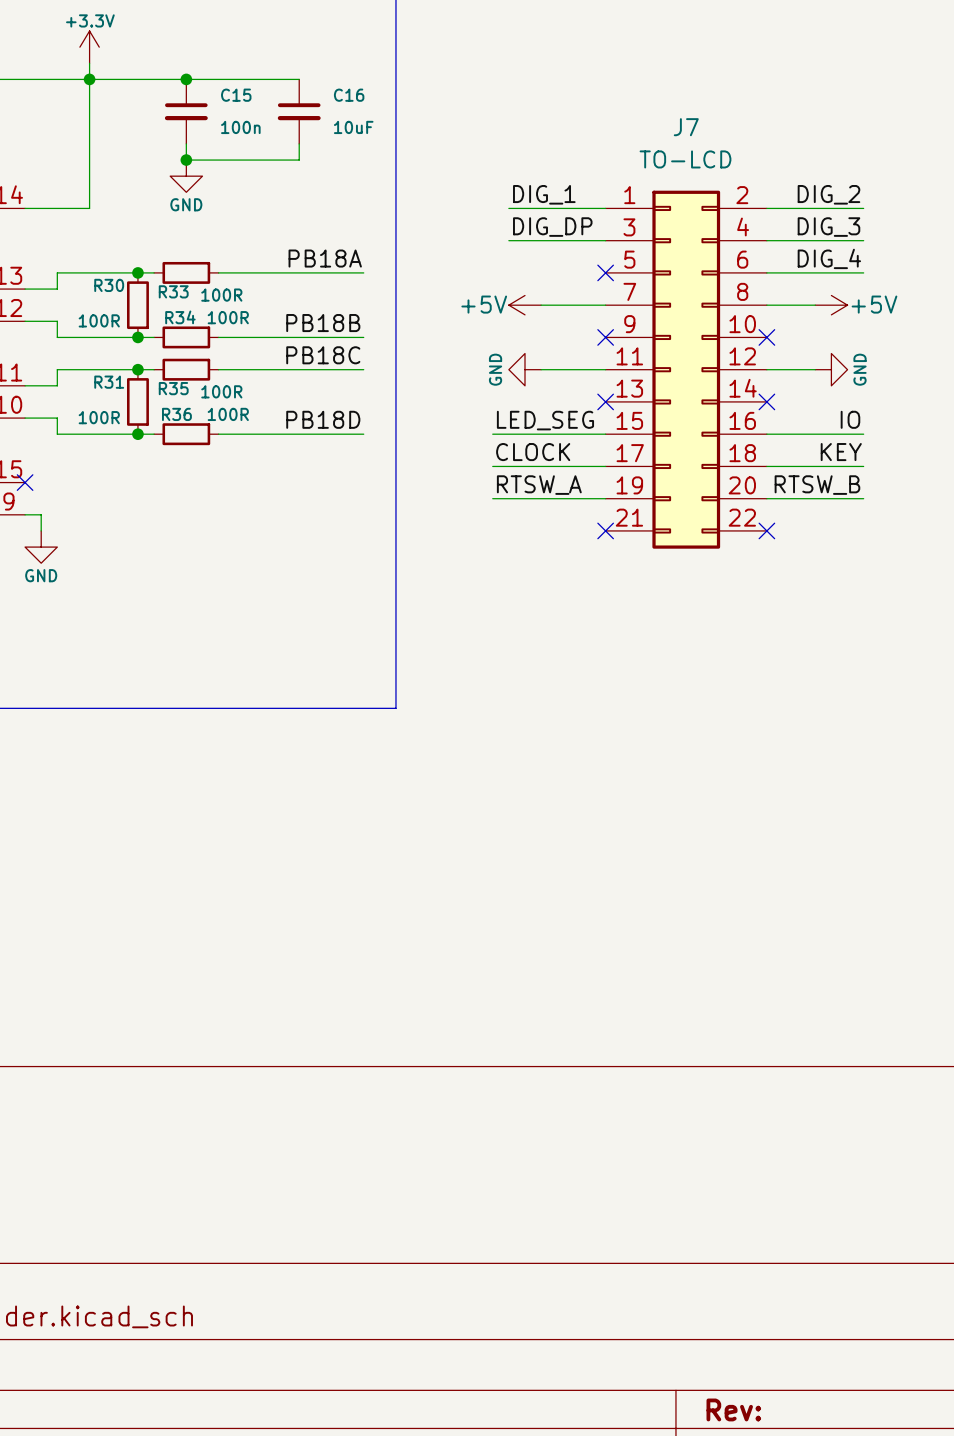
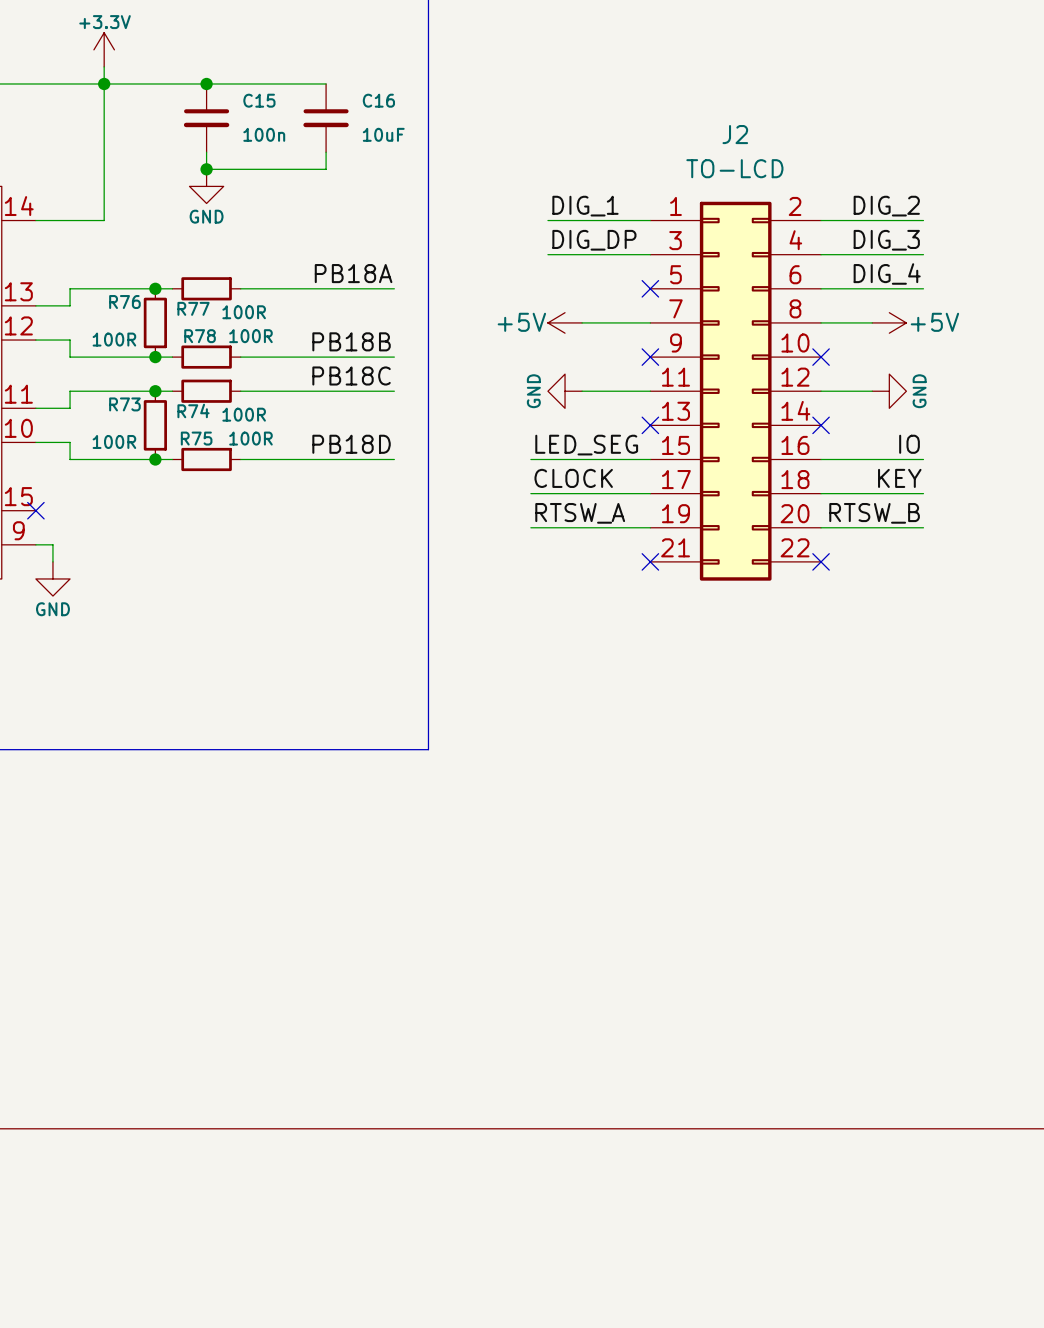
J7 name: J7 (686, 127) -> J2 (735, 134)
R30 name: R30 (109, 285) -> R76 (124, 302)
R33 name: R33 (173, 291) -> R77 (193, 308)
R34 name: R34 (180, 317) -> R78 (200, 336)
R31 name: R31 (109, 382) -> R73 (124, 404)
R35 name: R35 (173, 388) -> R74 (193, 410)
R36 name: R36 (176, 414) -> R75 (196, 438)

